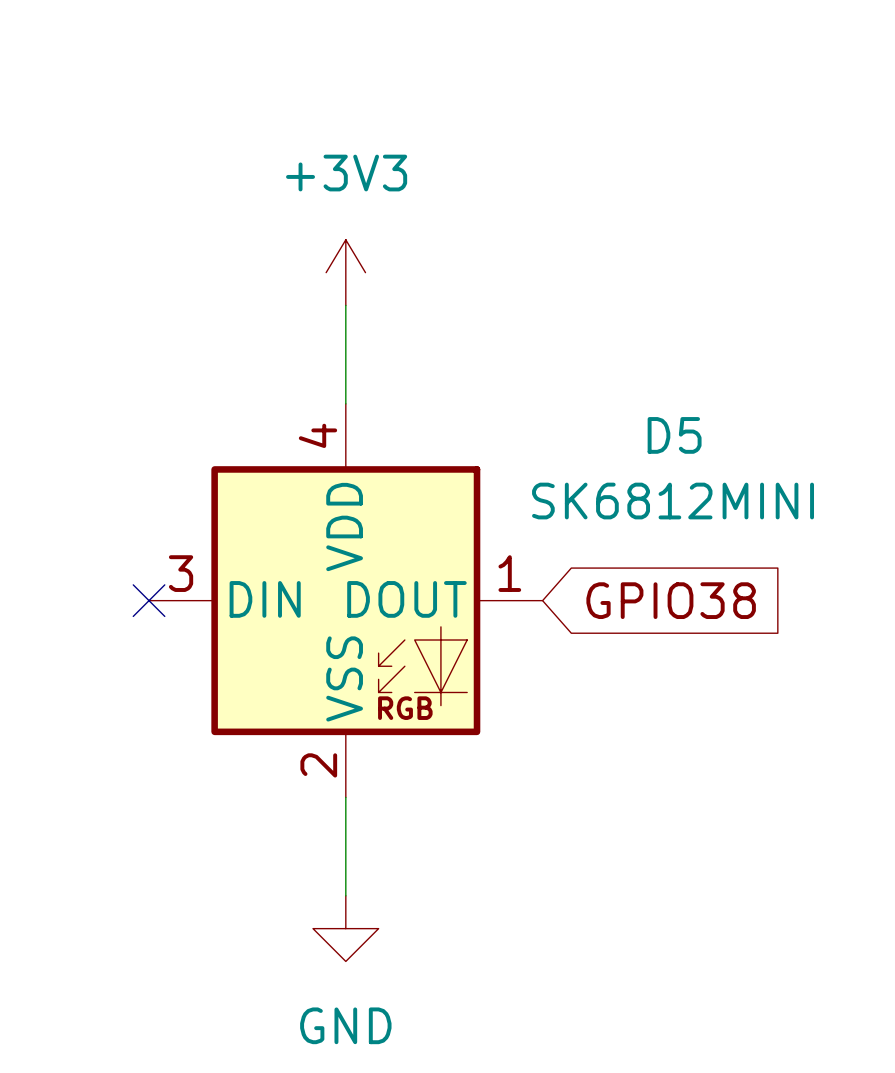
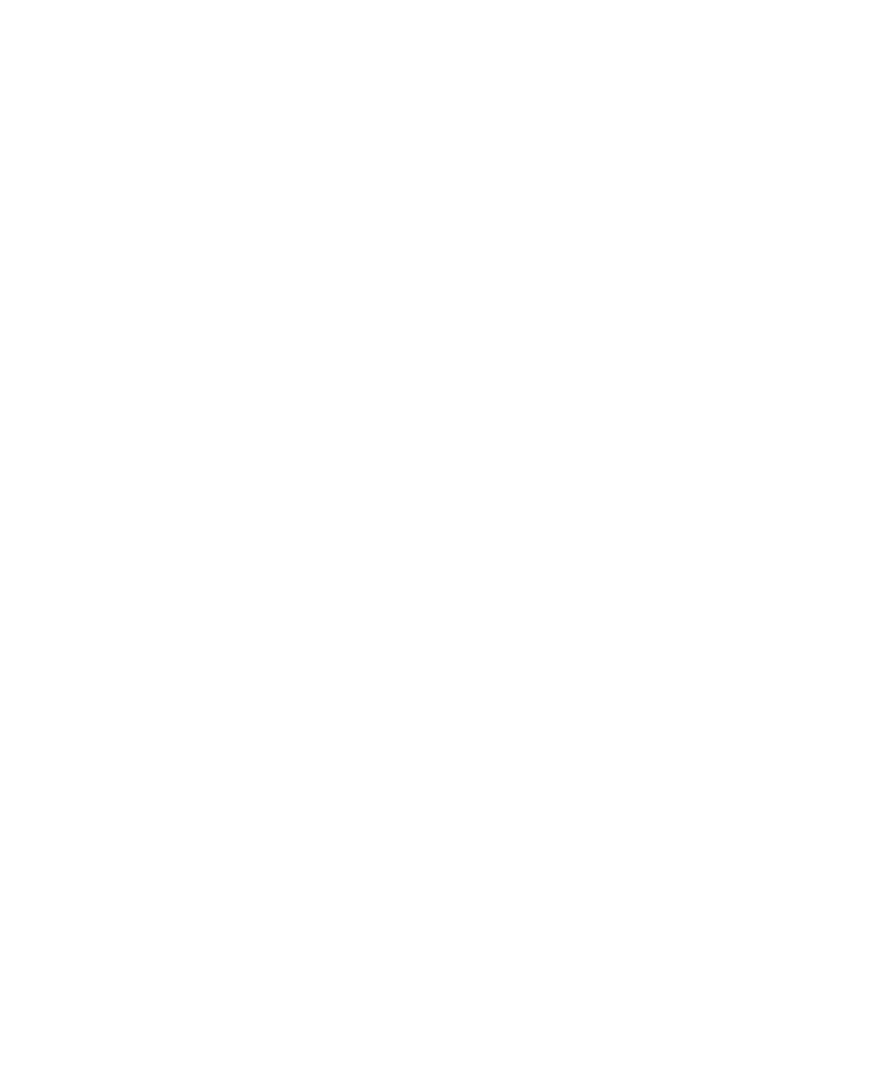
power symbol: +3V3 (345, 272) -> none
wire: (345, 305) (345, 403) -> none
no-connect mark: (149, 600) -> none
D5: SK6812MINI (345, 600) -> none
global label: GPIO38 (671, 600) -> none
wire: (345, 797) (345, 895) -> none
power symbol: GND (345, 928) -> none

